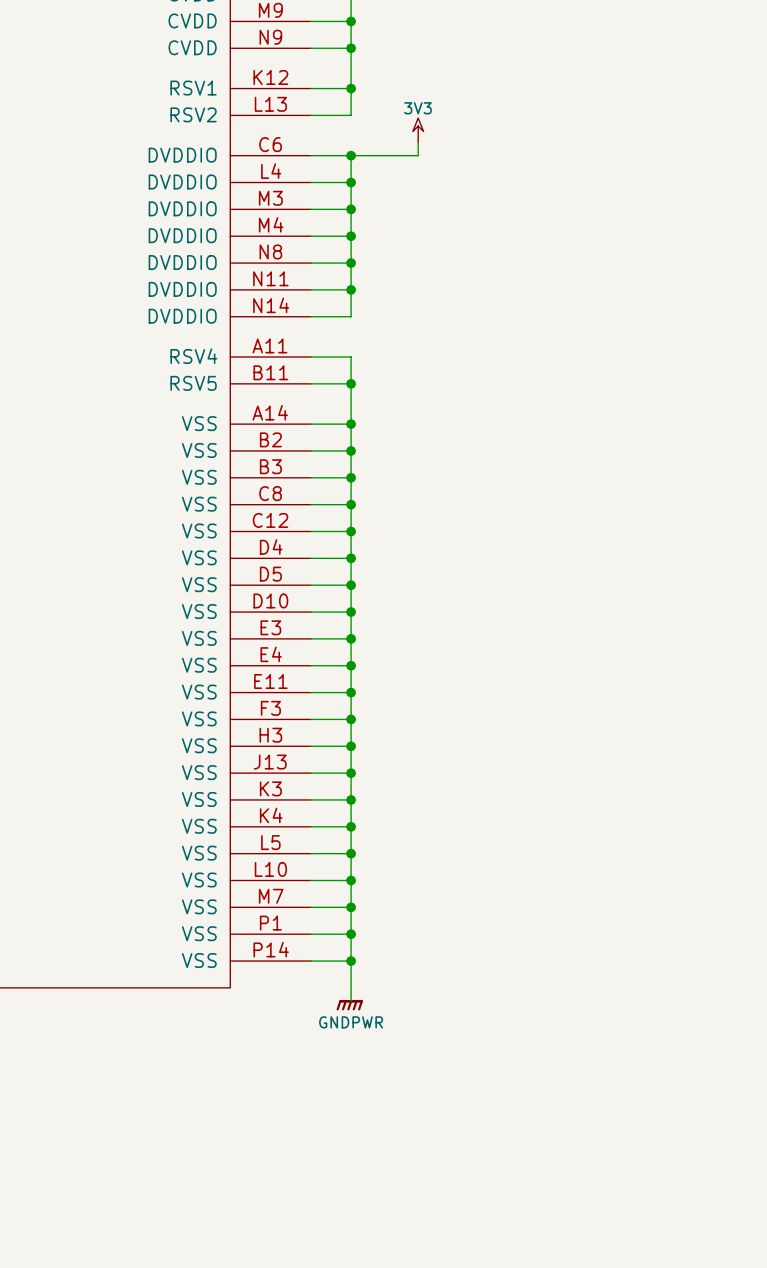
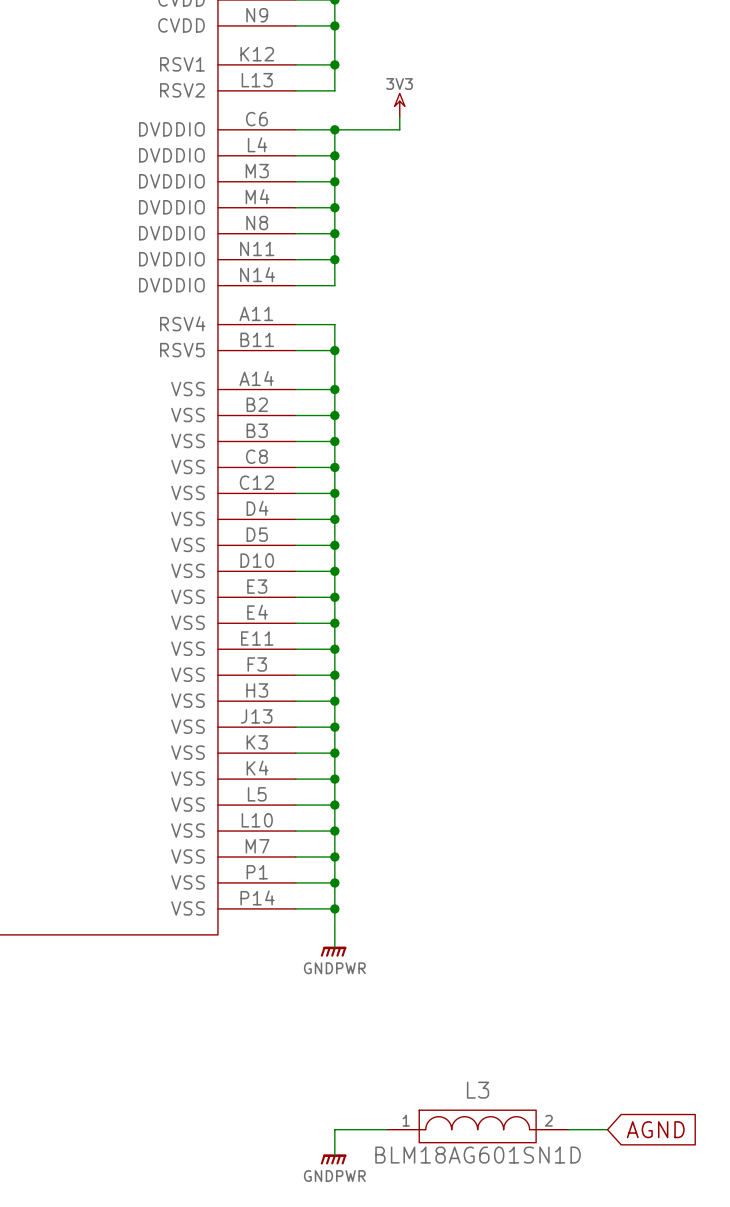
L3: none -> BLM18AG601SN1D (477, 1126)
wire: none -> (386, 1129) (334, 1129) (334, 1155)
wire: none -> (568, 1129) (607, 1129)
global label: none -> AGND (655, 1129)
power symbol: none -> GNDPWR (333, 1159)

